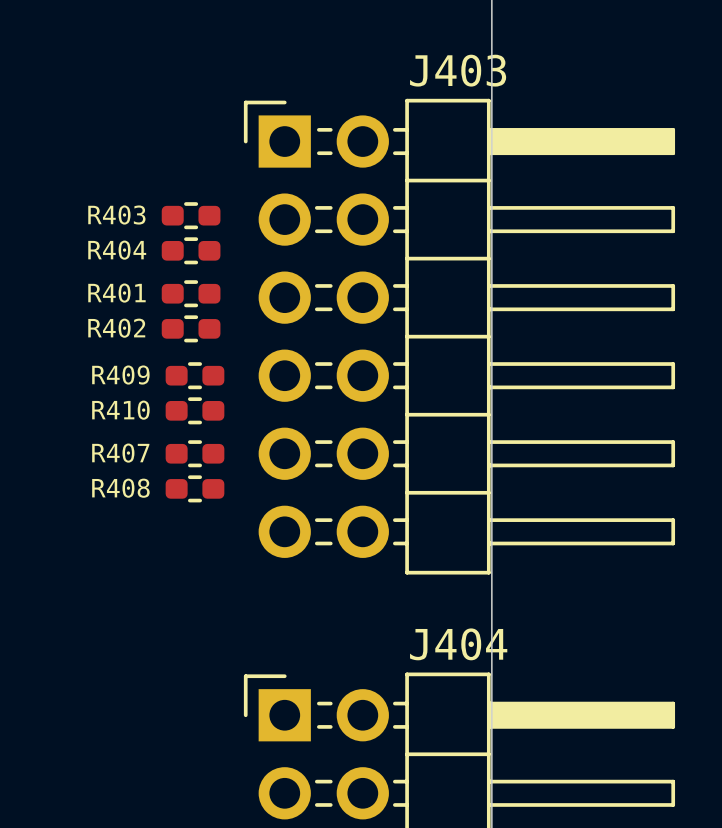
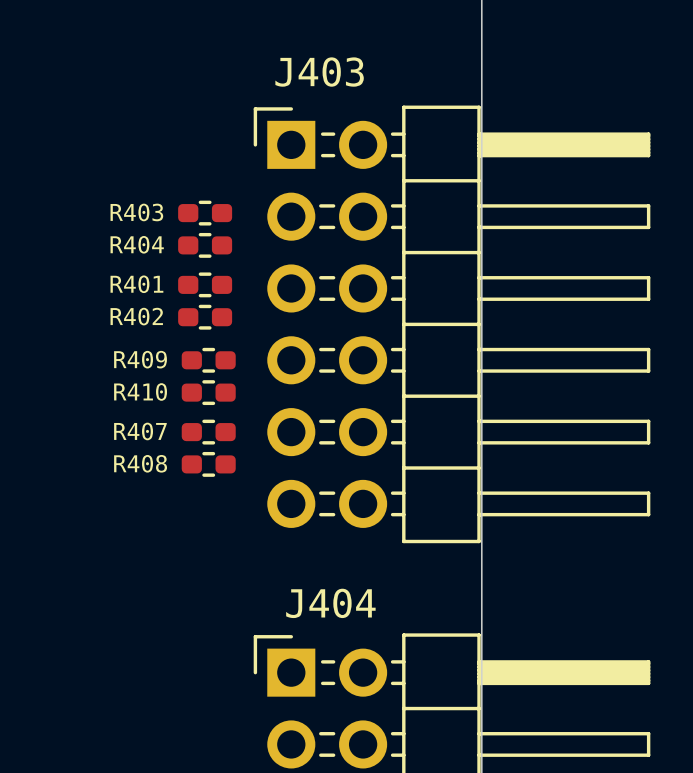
J403 name position: J403 (458, 70) -> J403 (319, 72)
J404 name position: J404 (458, 644) -> J404 (330, 603)

